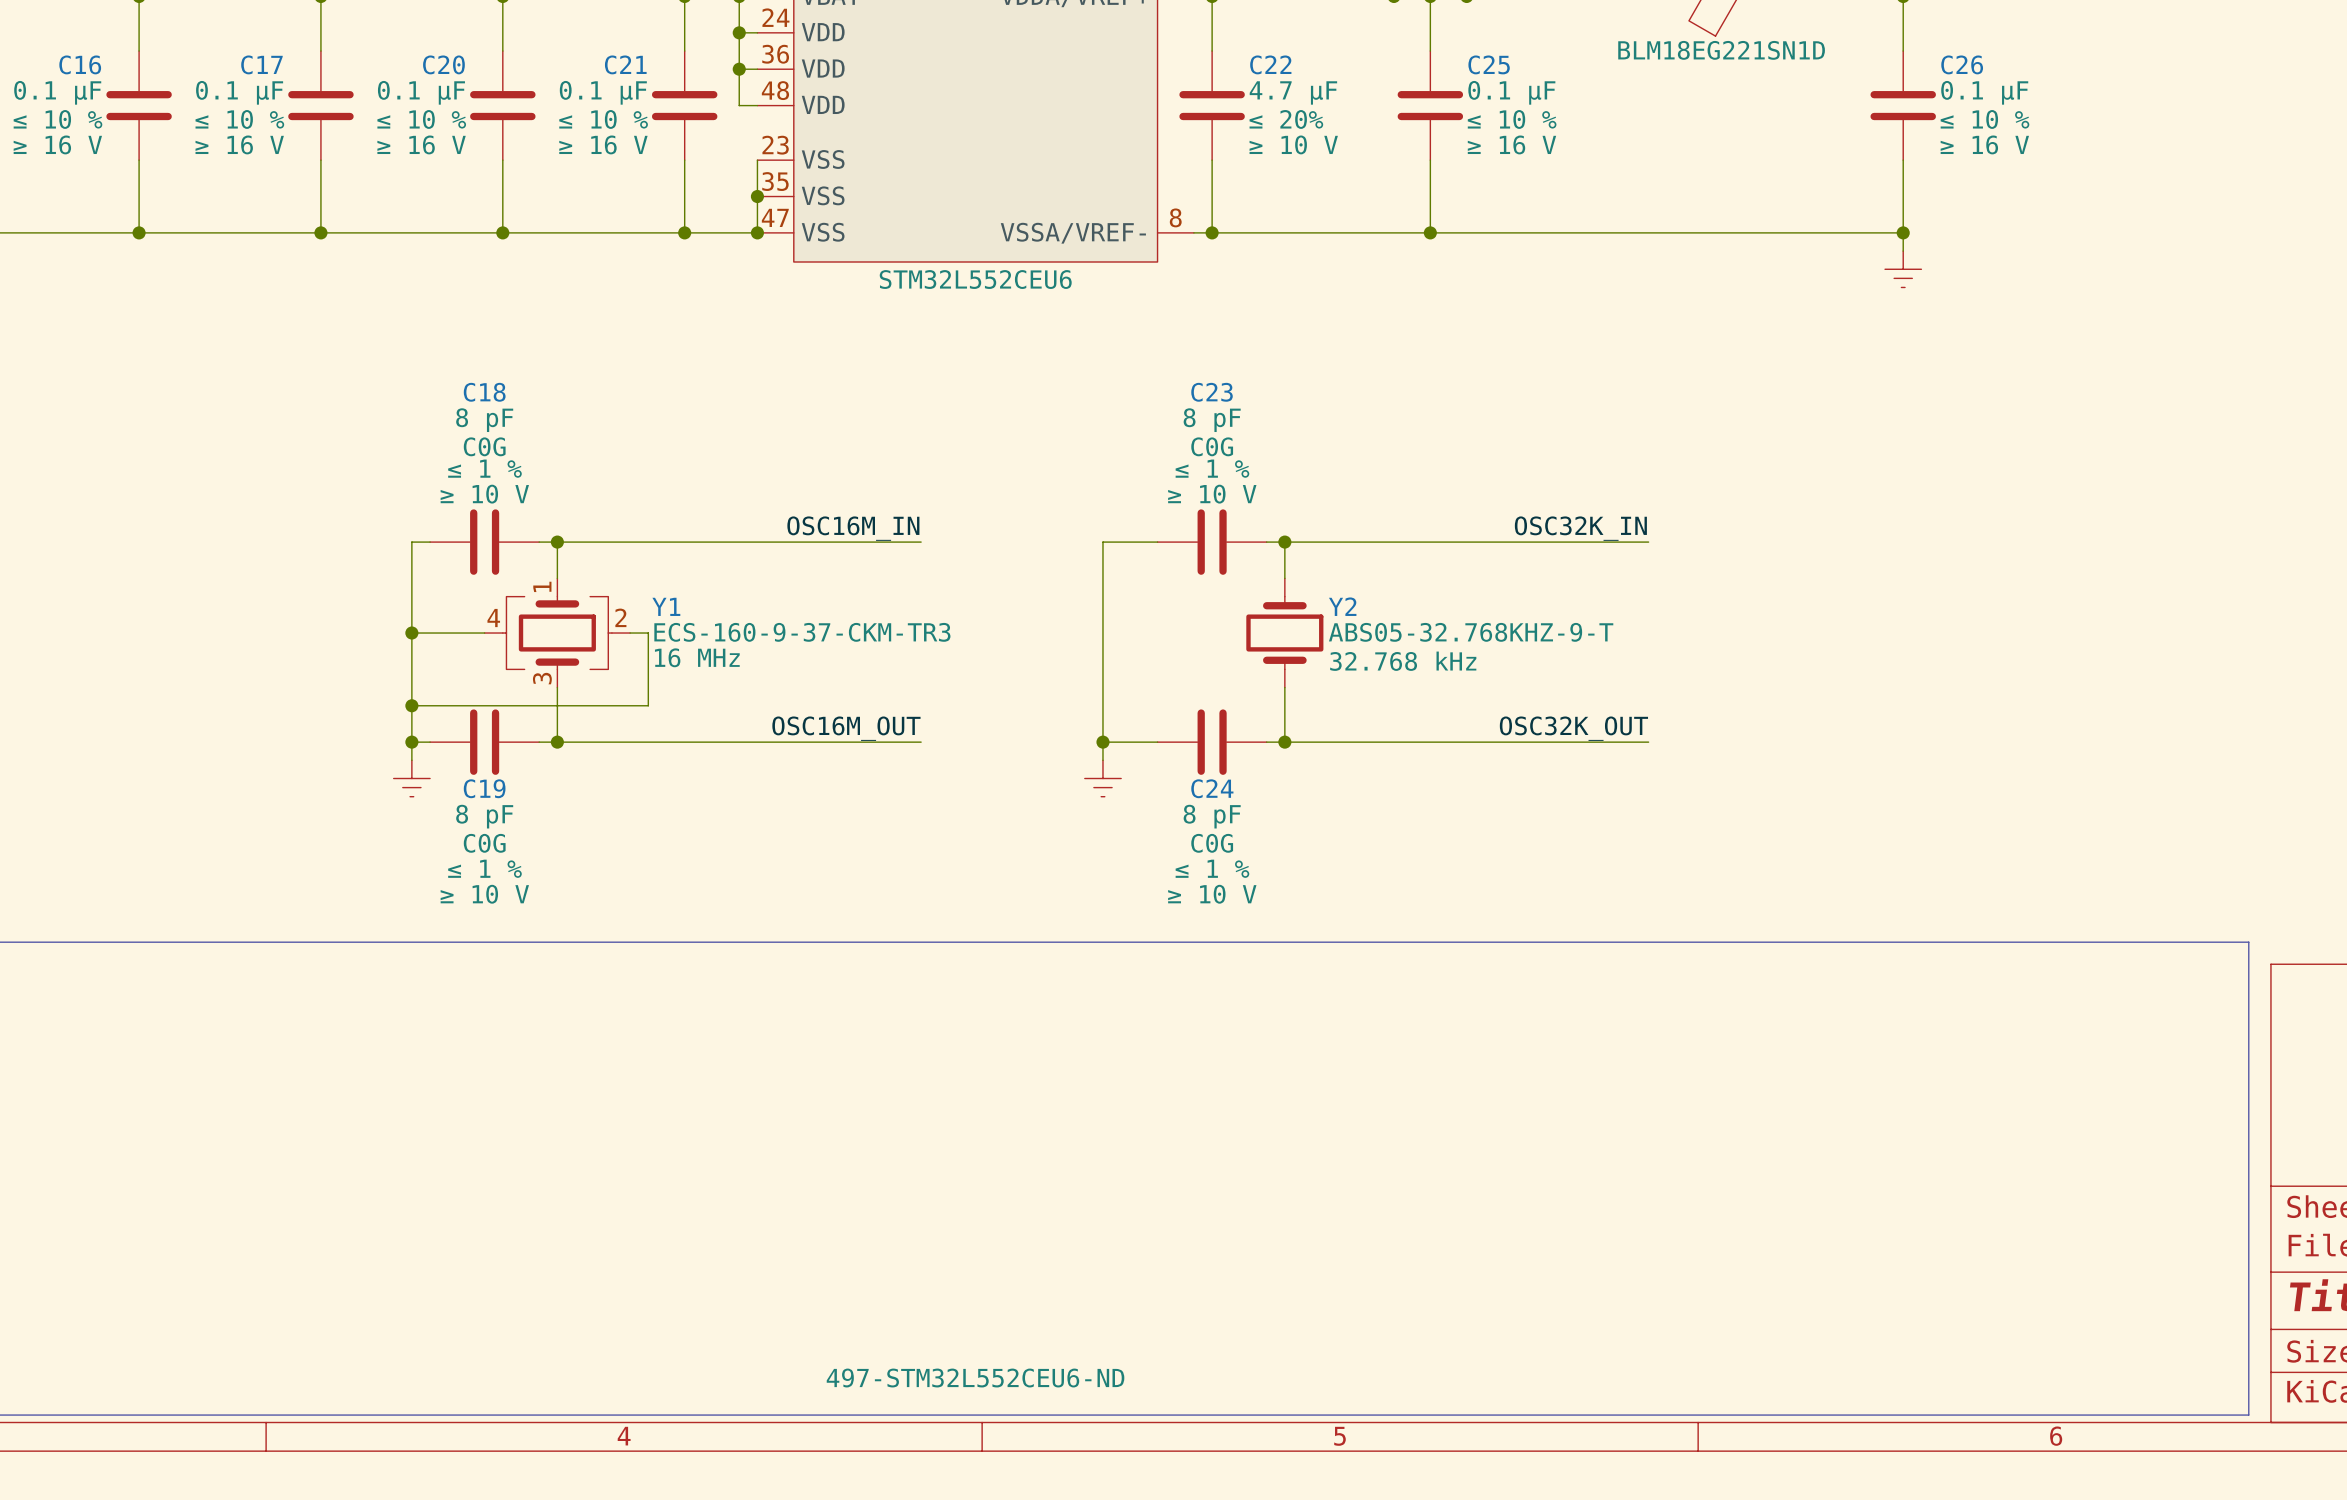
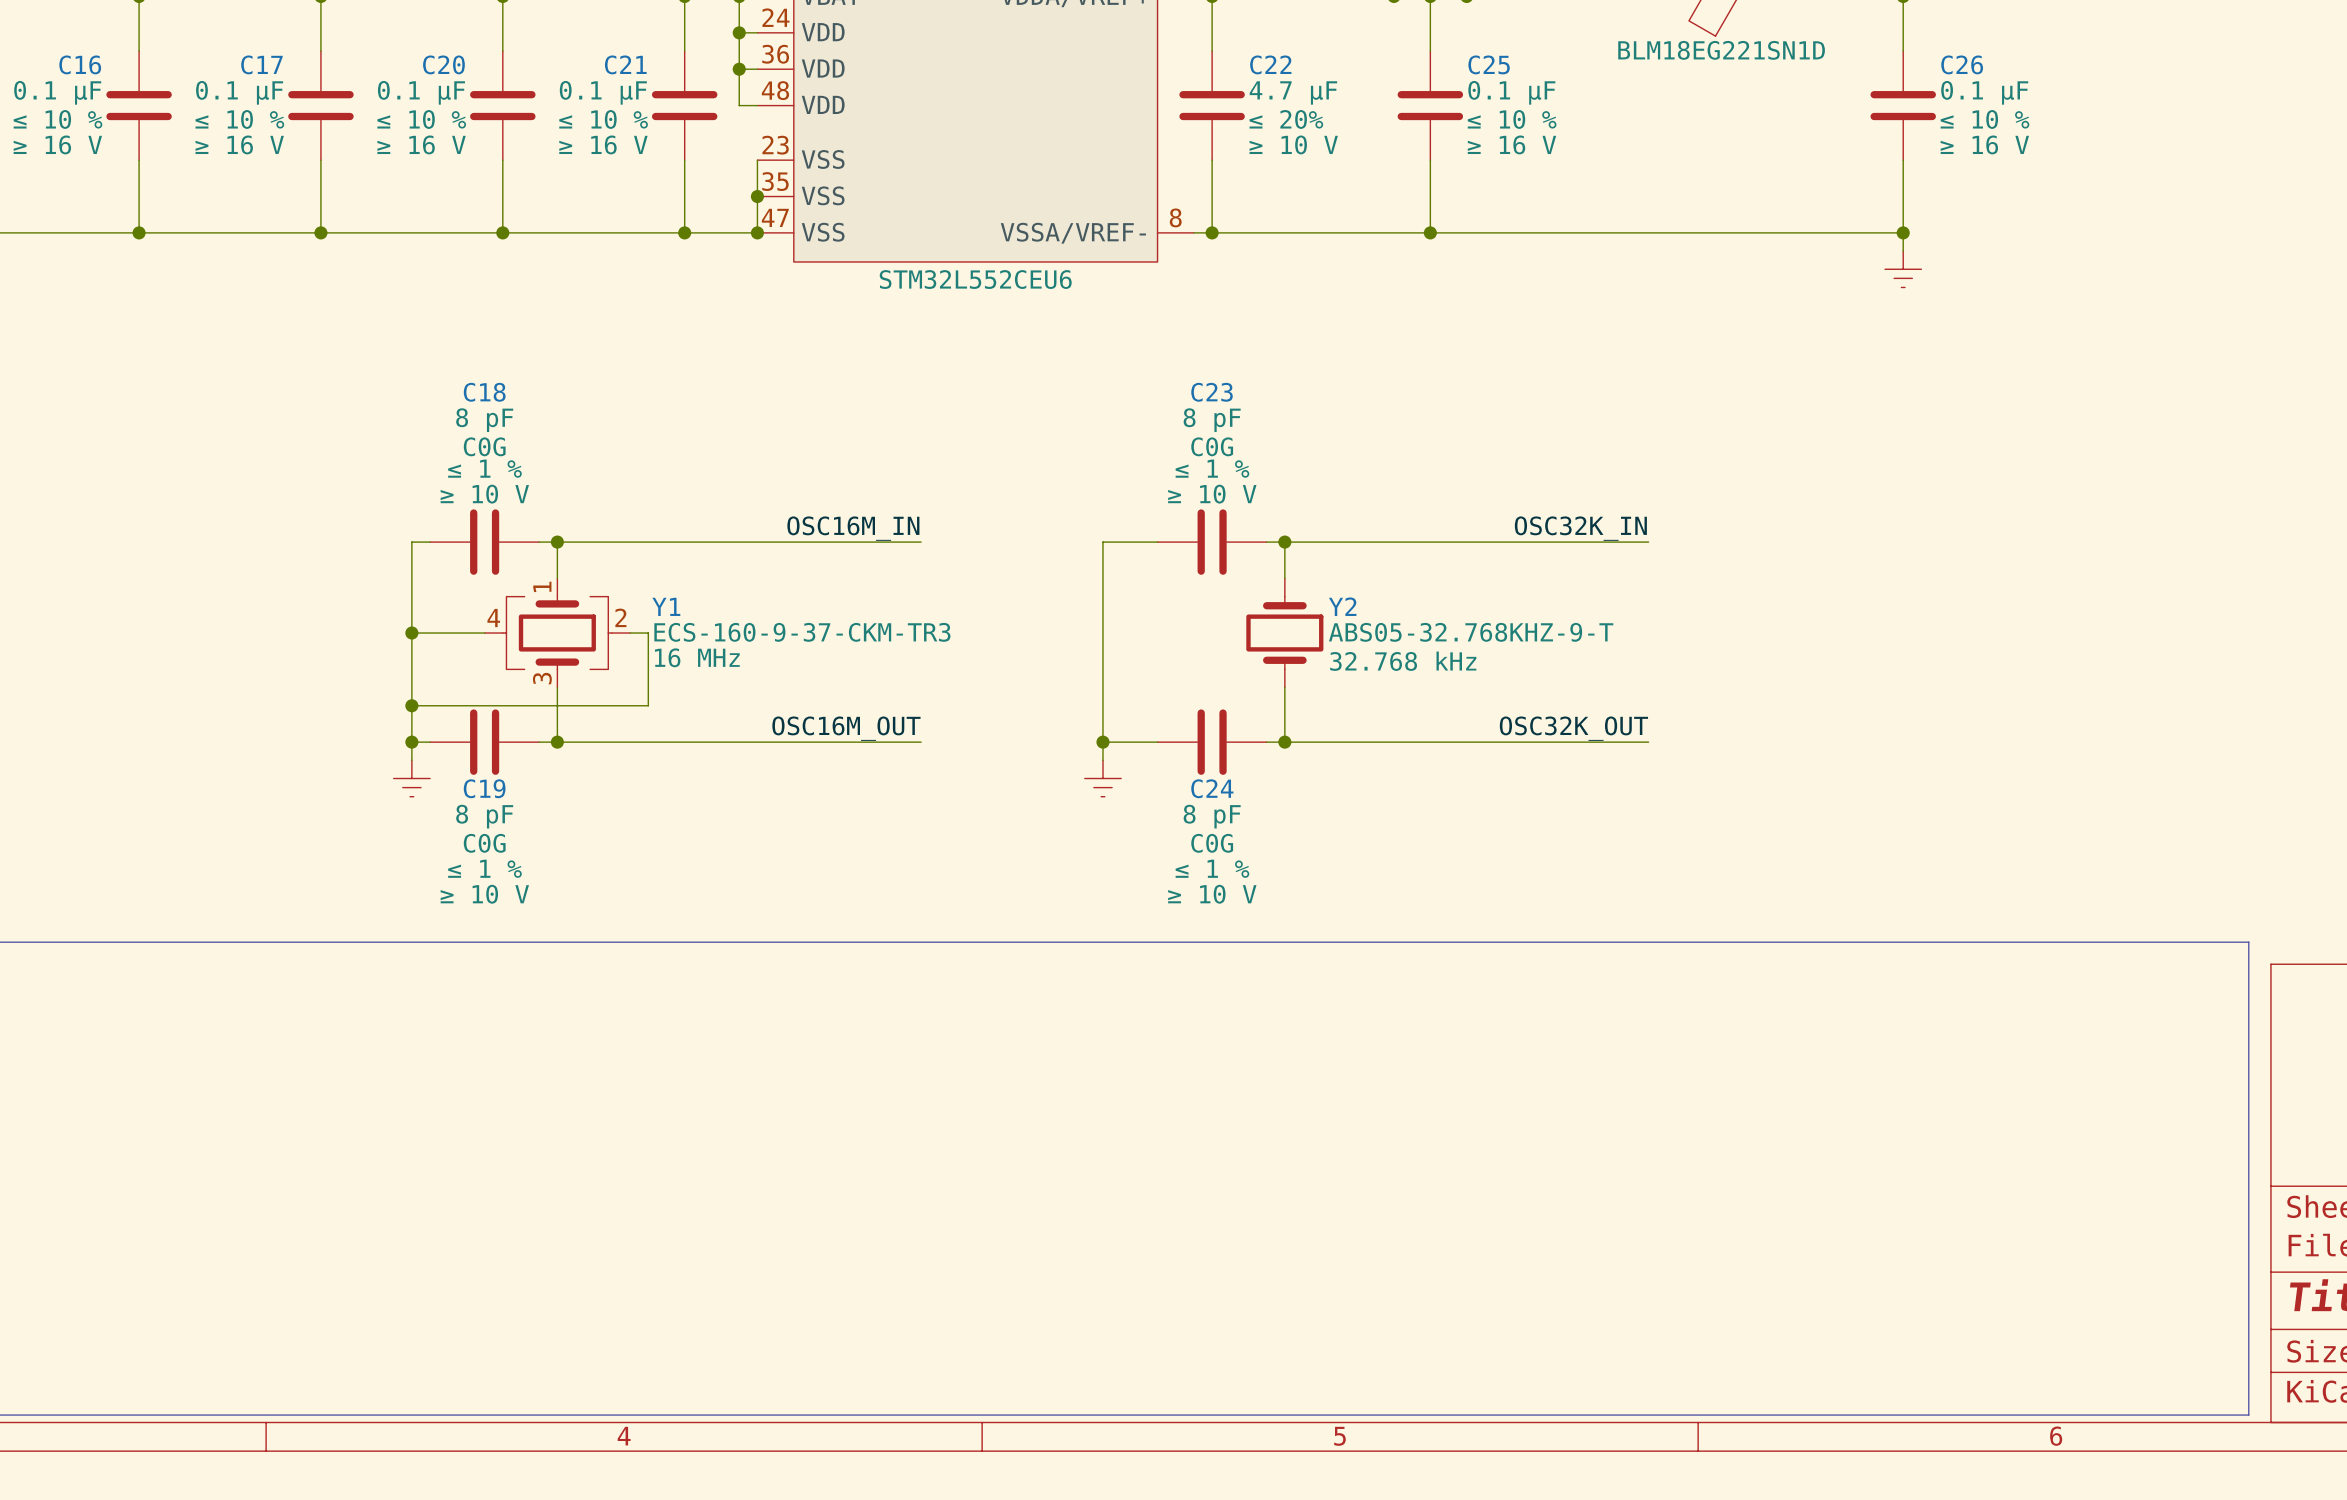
part text: 497-STM32L552CEU6-ND (975, 1378) -> none

